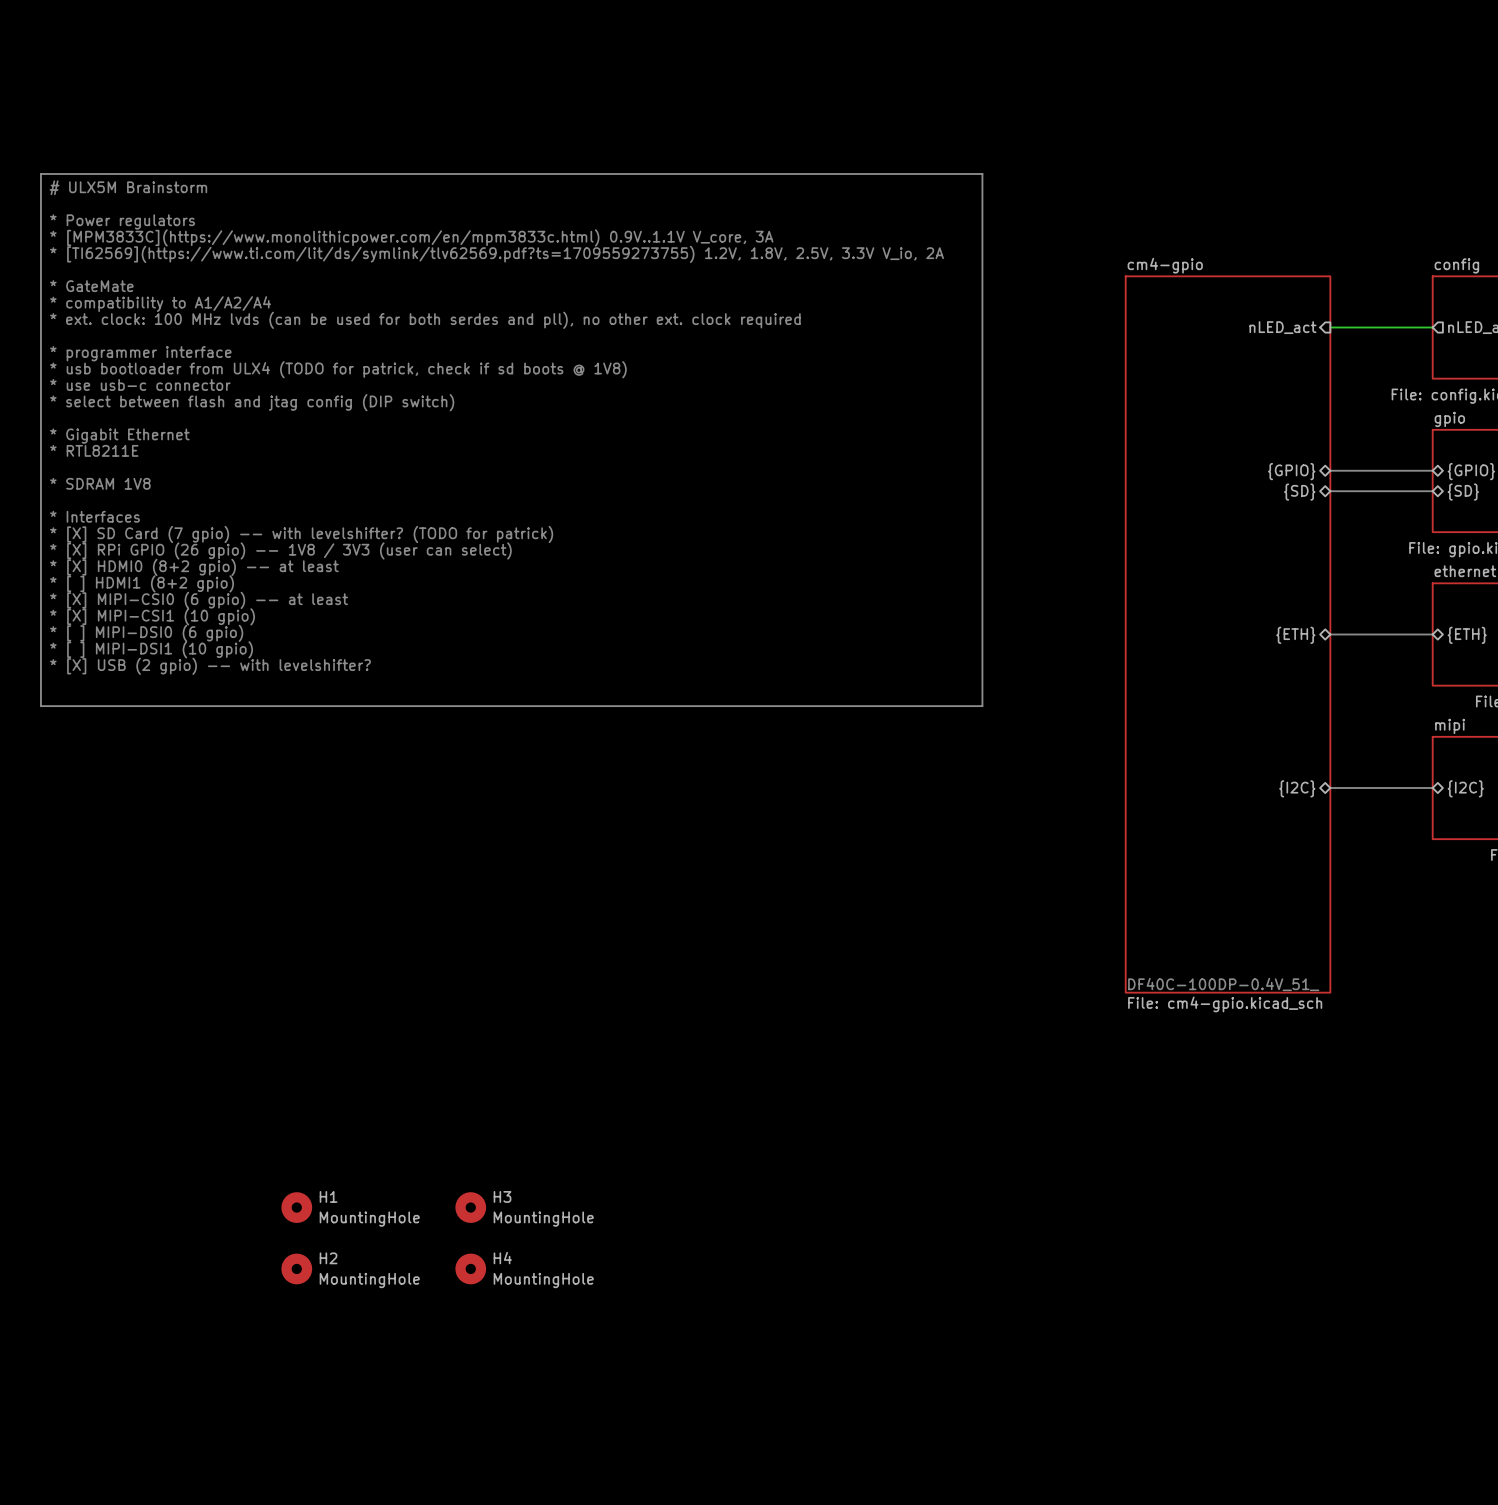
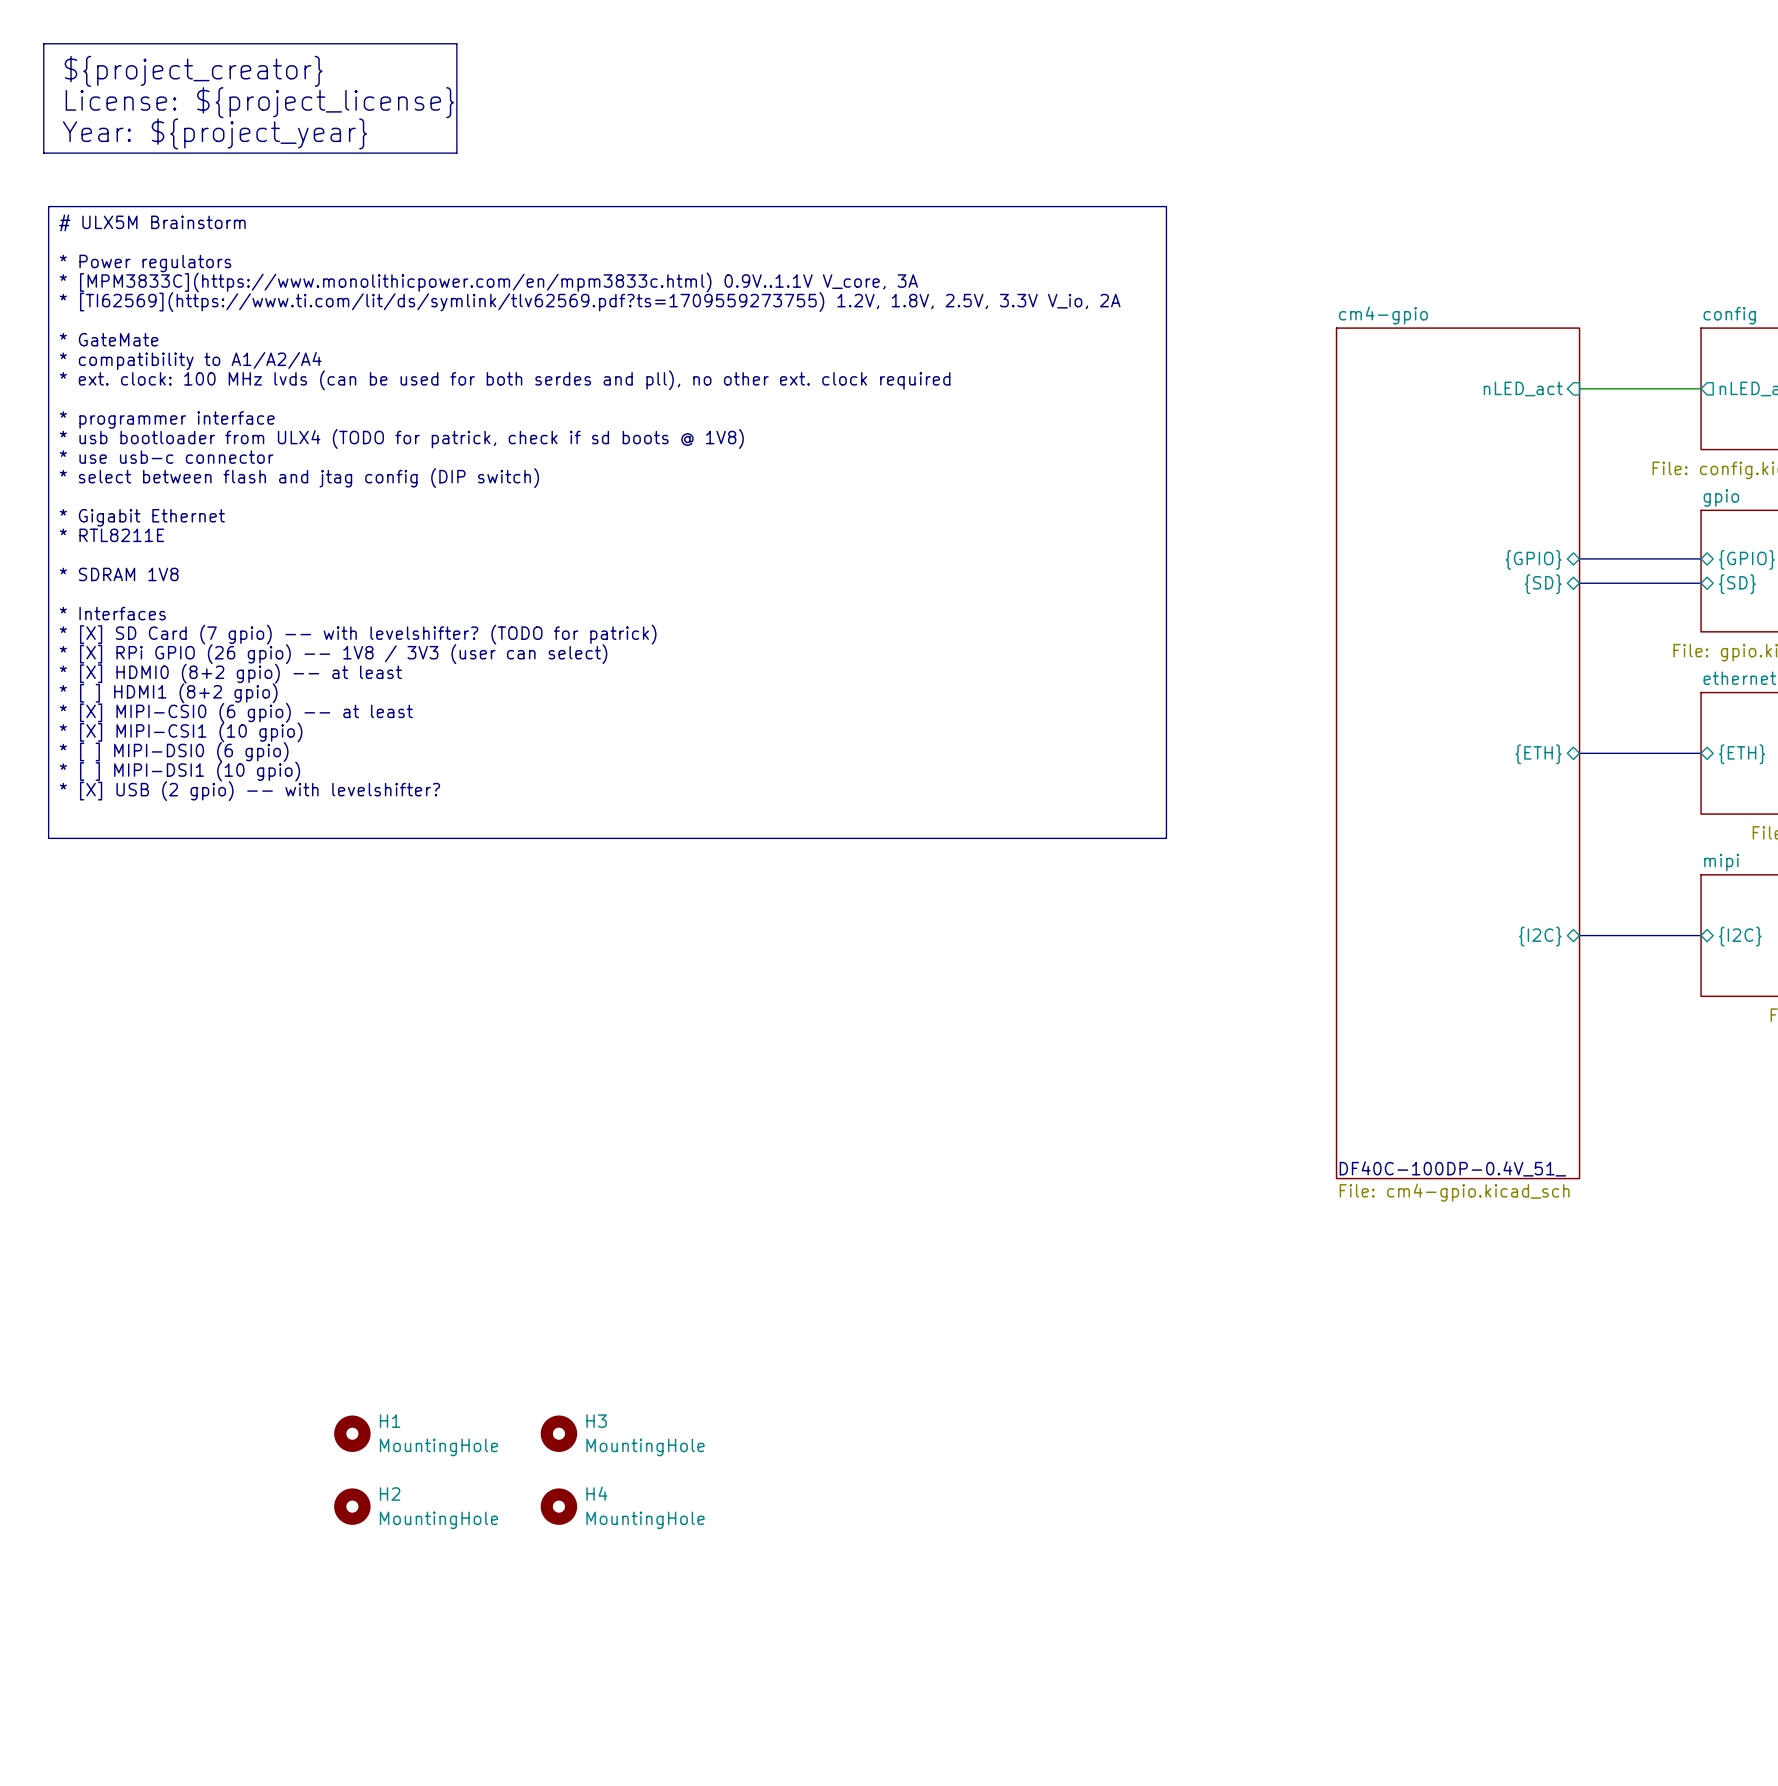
line: none -> (43, 43) (456, 43) (456, 153) (43, 153) (43, 43)
text: none -> ${project_creator} (193, 71)
text: none -> License: ${project_license} (259, 102)
text: none -> Year: ${project_year} (214, 133)

